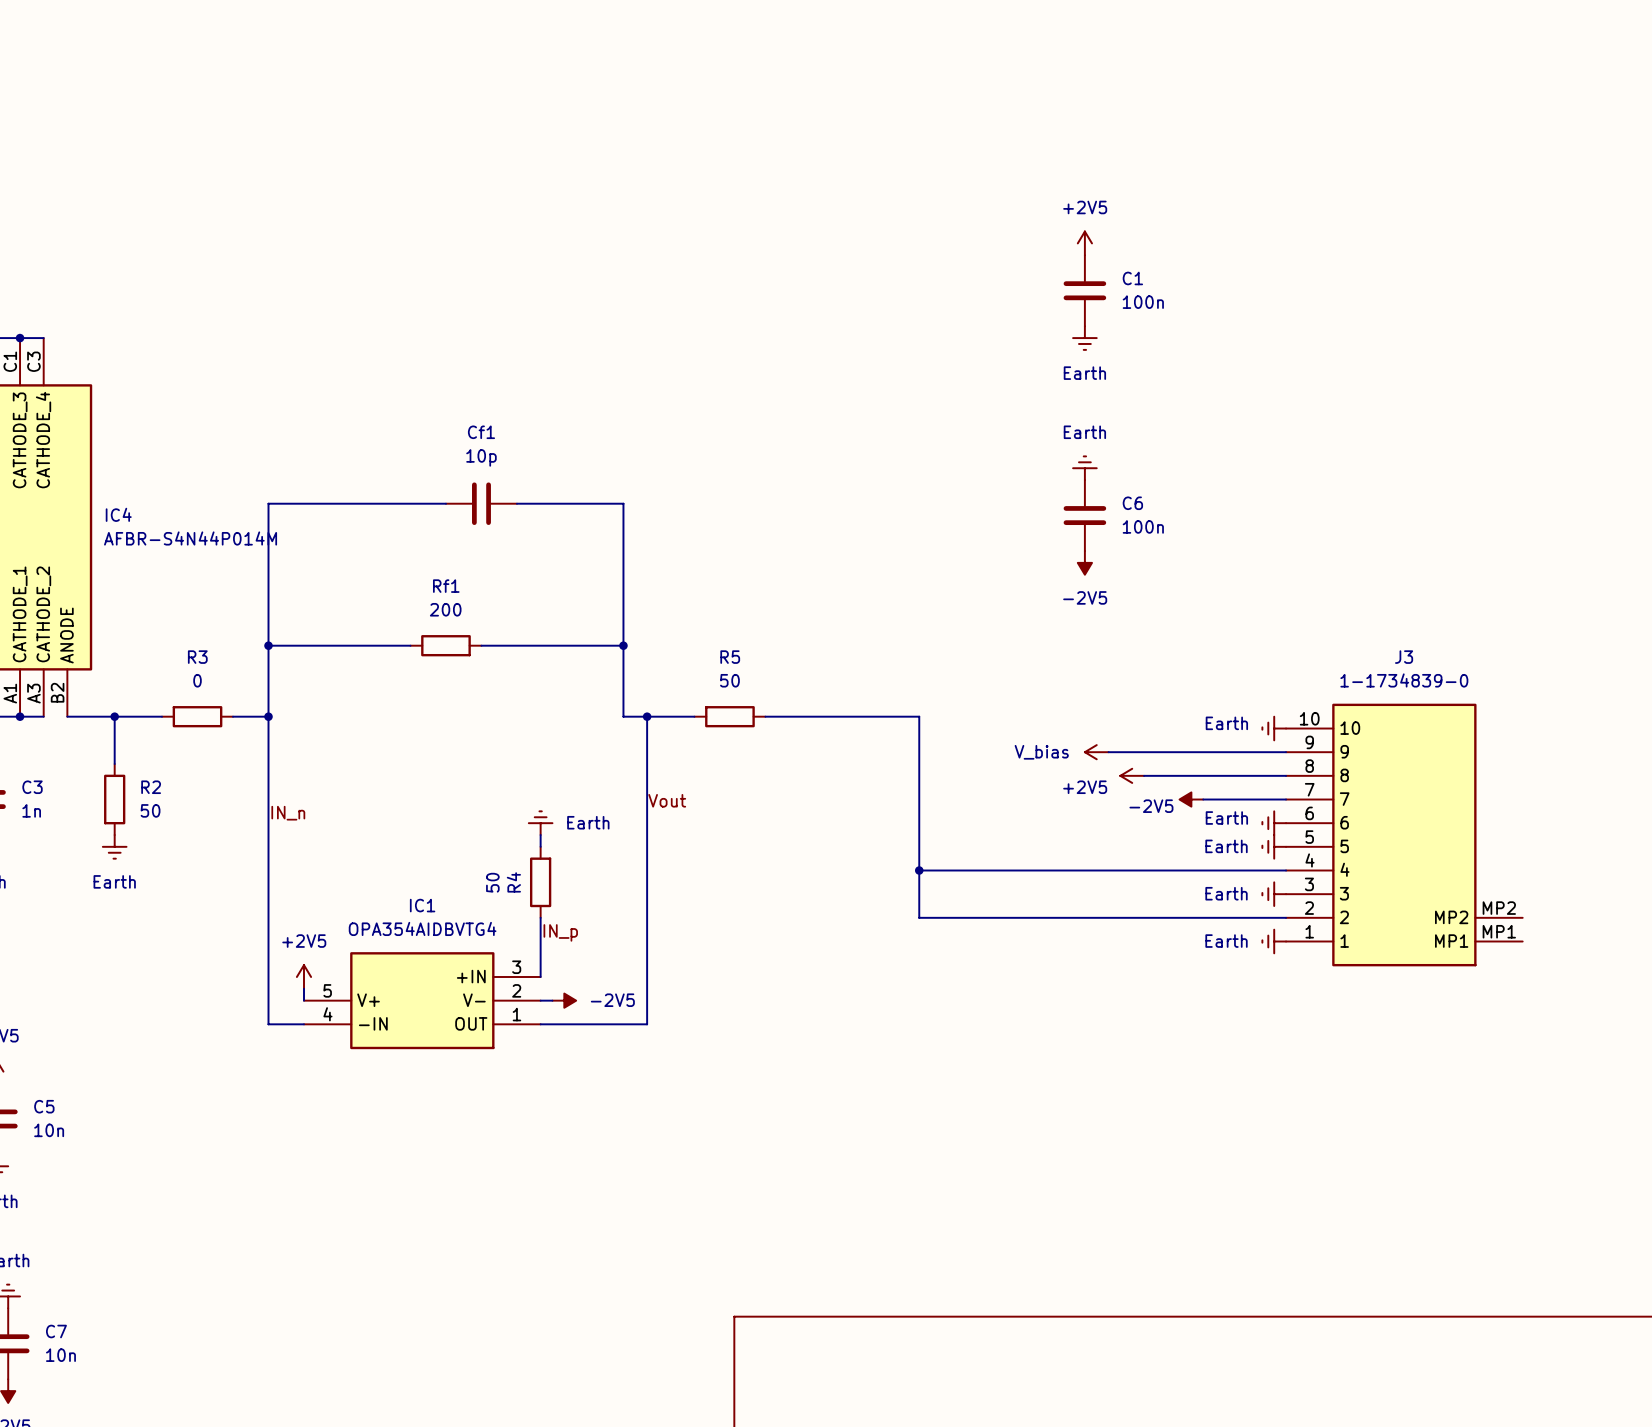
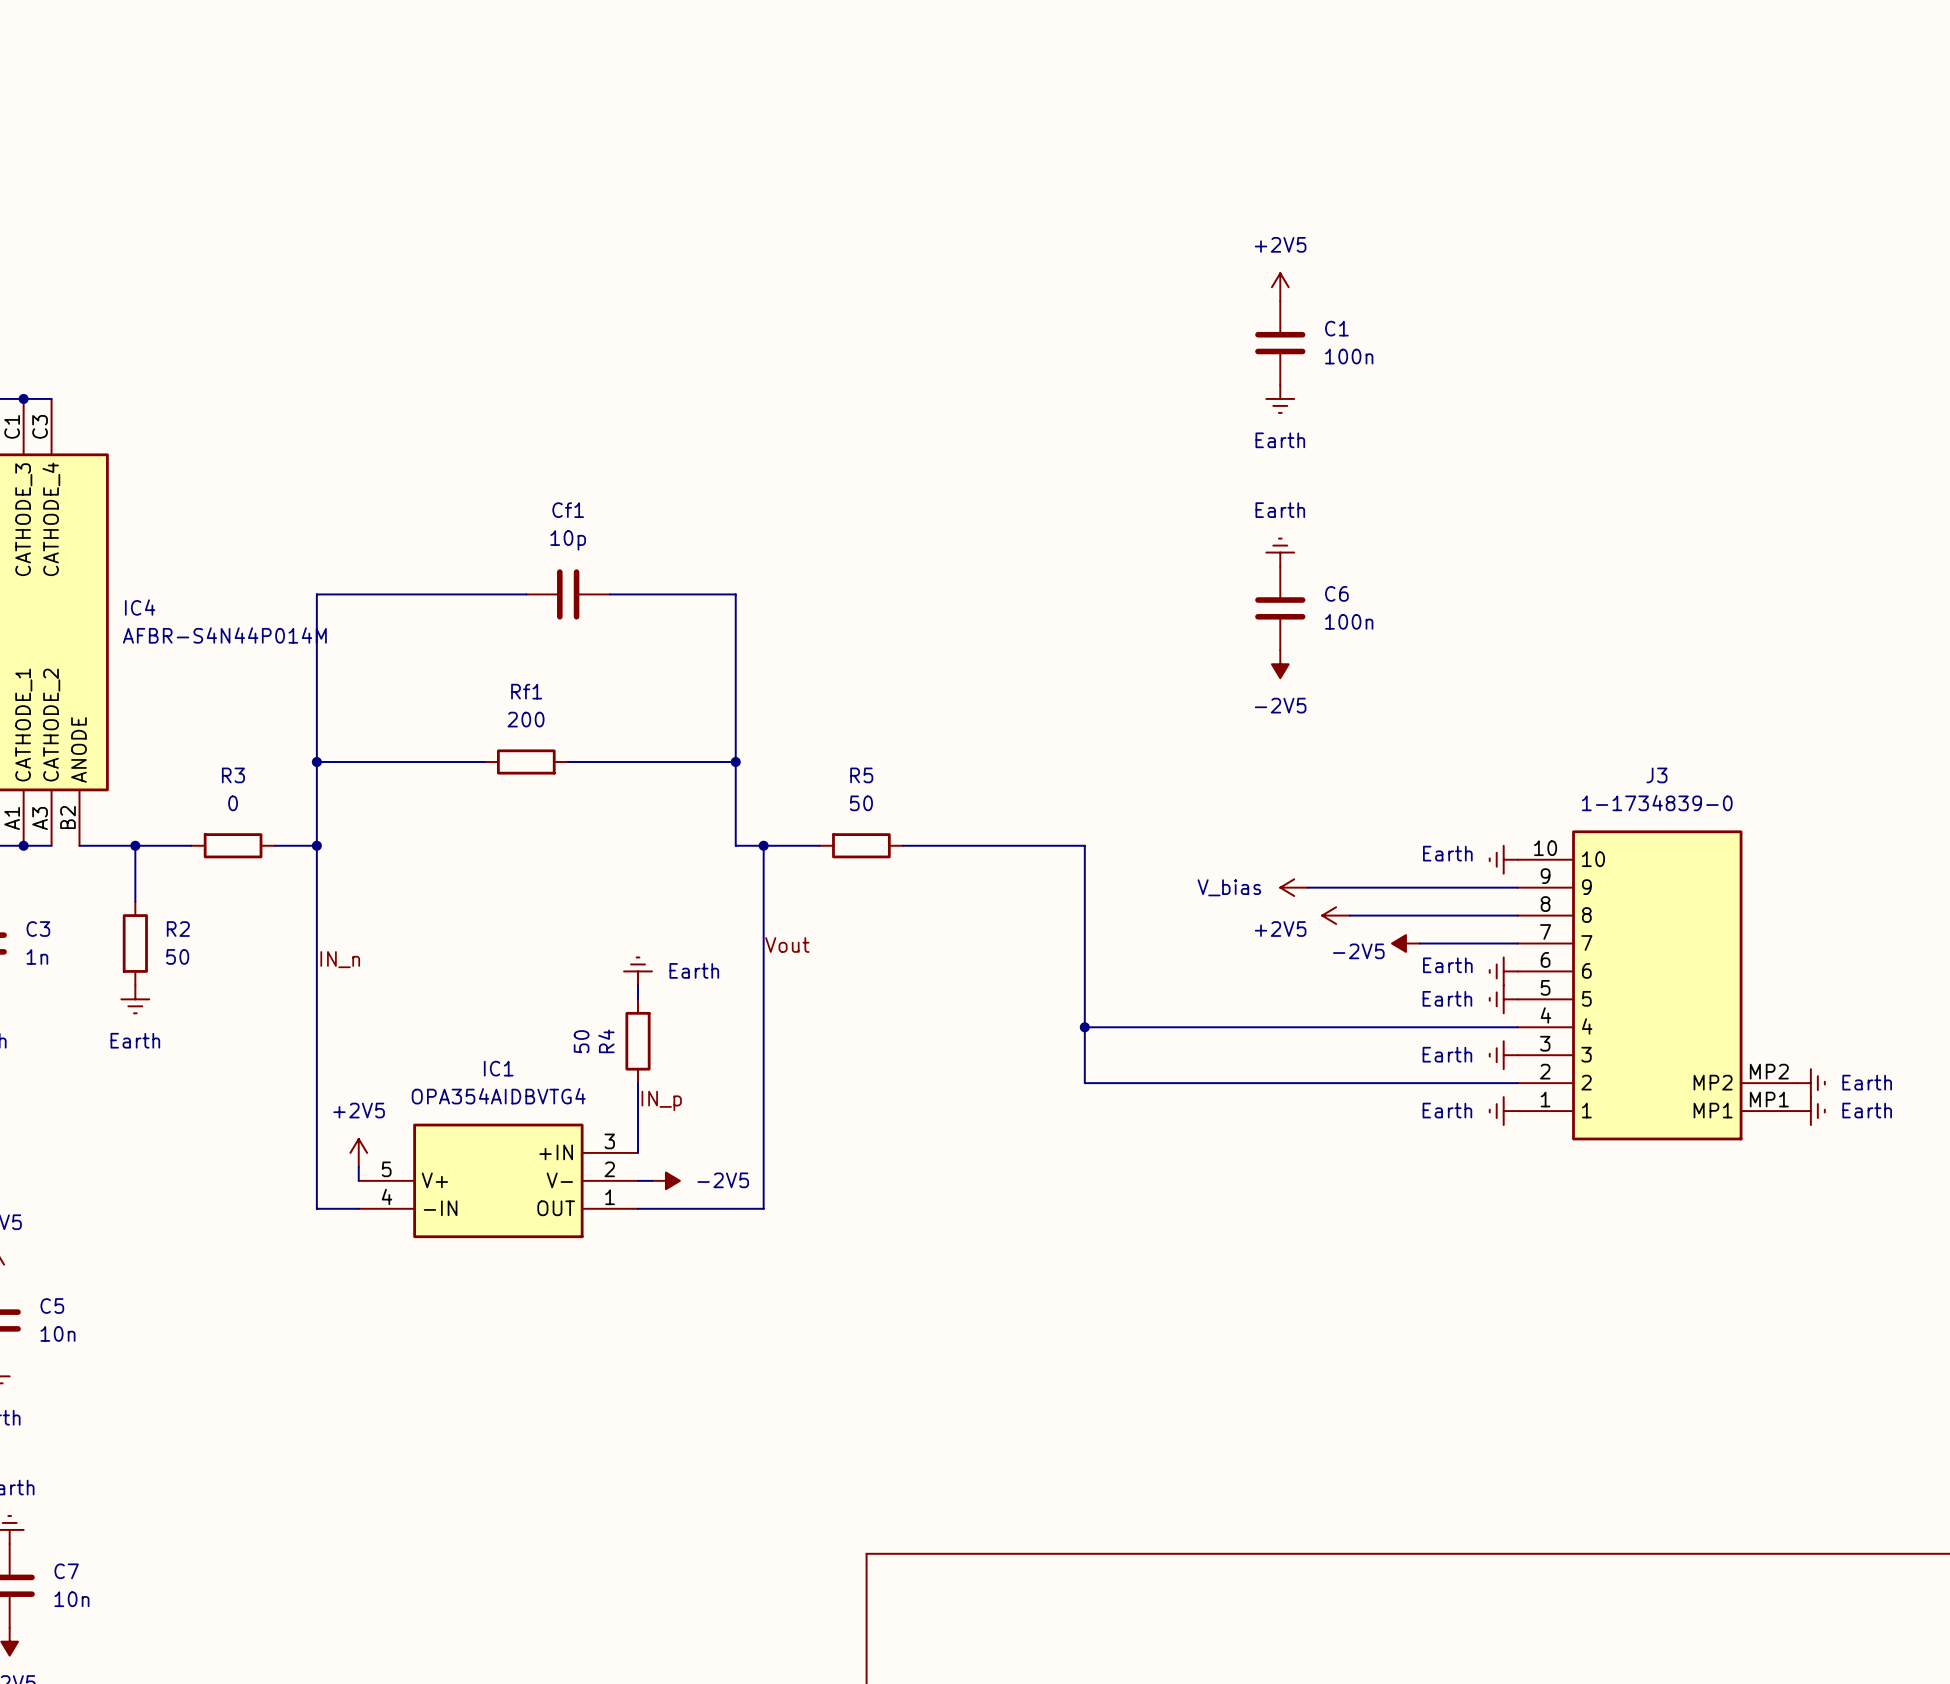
power symbol: none -> Earth (1810, 1083)
power symbol: none -> Earth (1810, 1111)

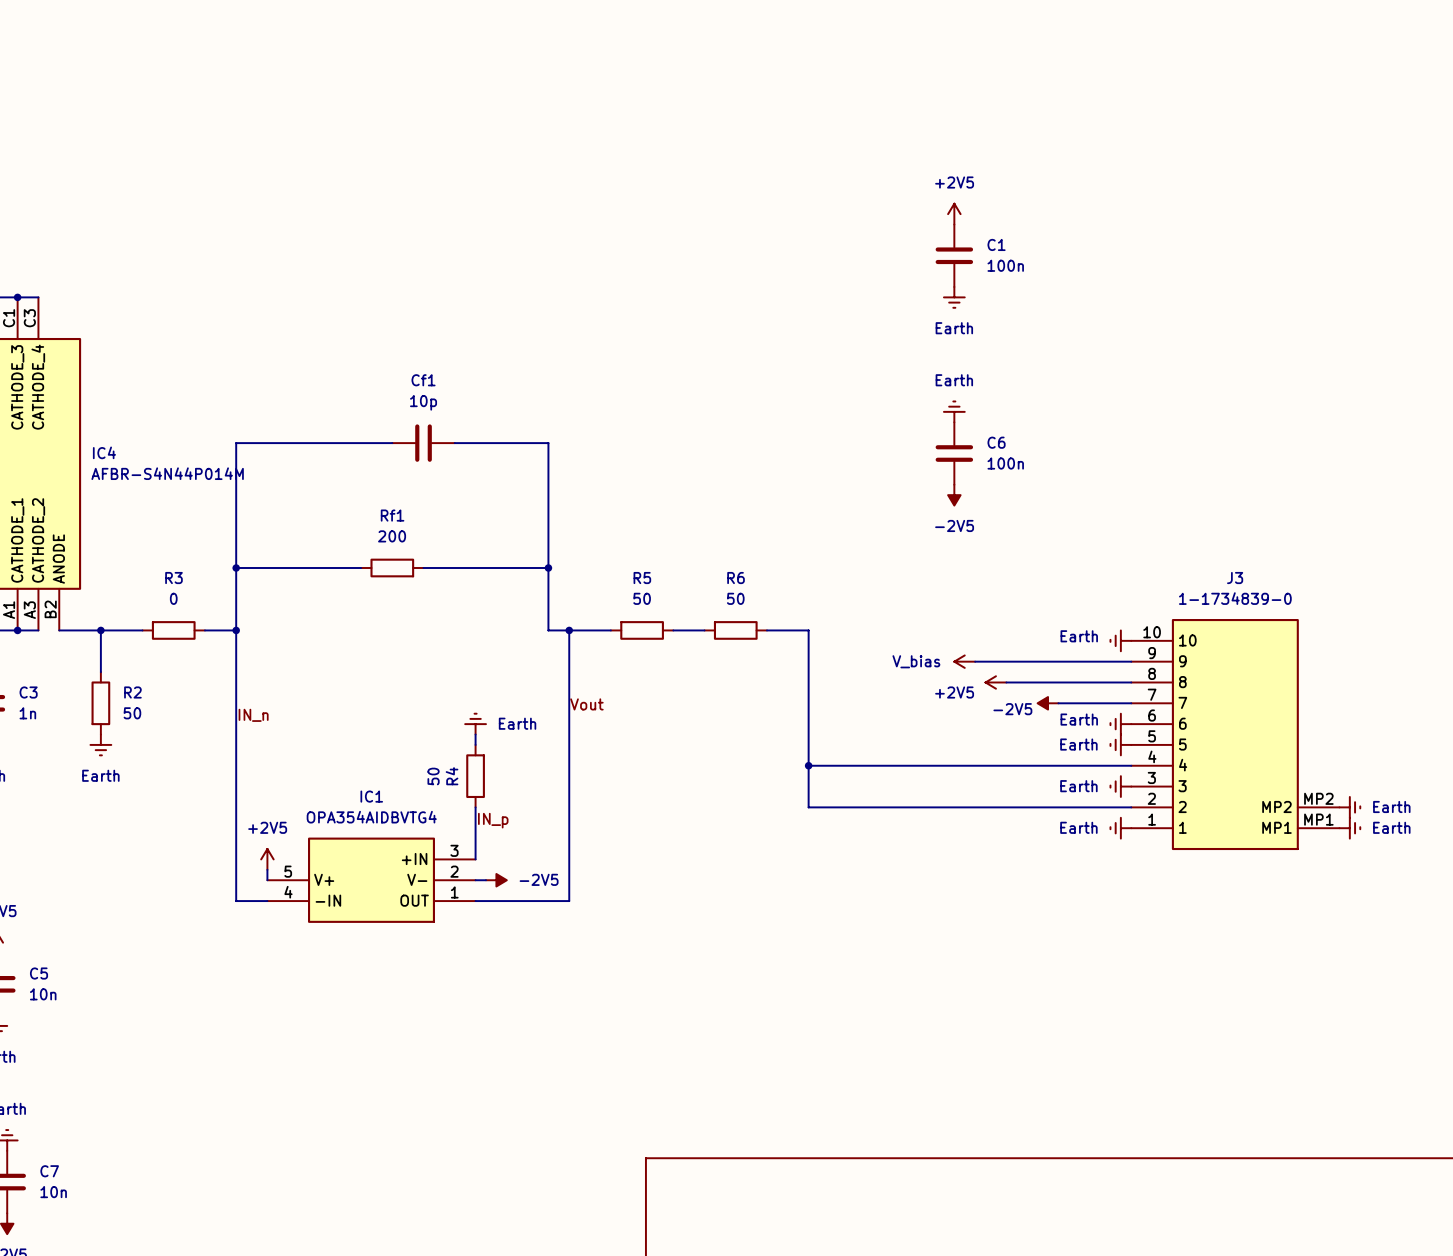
wire: (945, 845) (1028, 845) -> none
R6: none -> 50 (735, 630)

